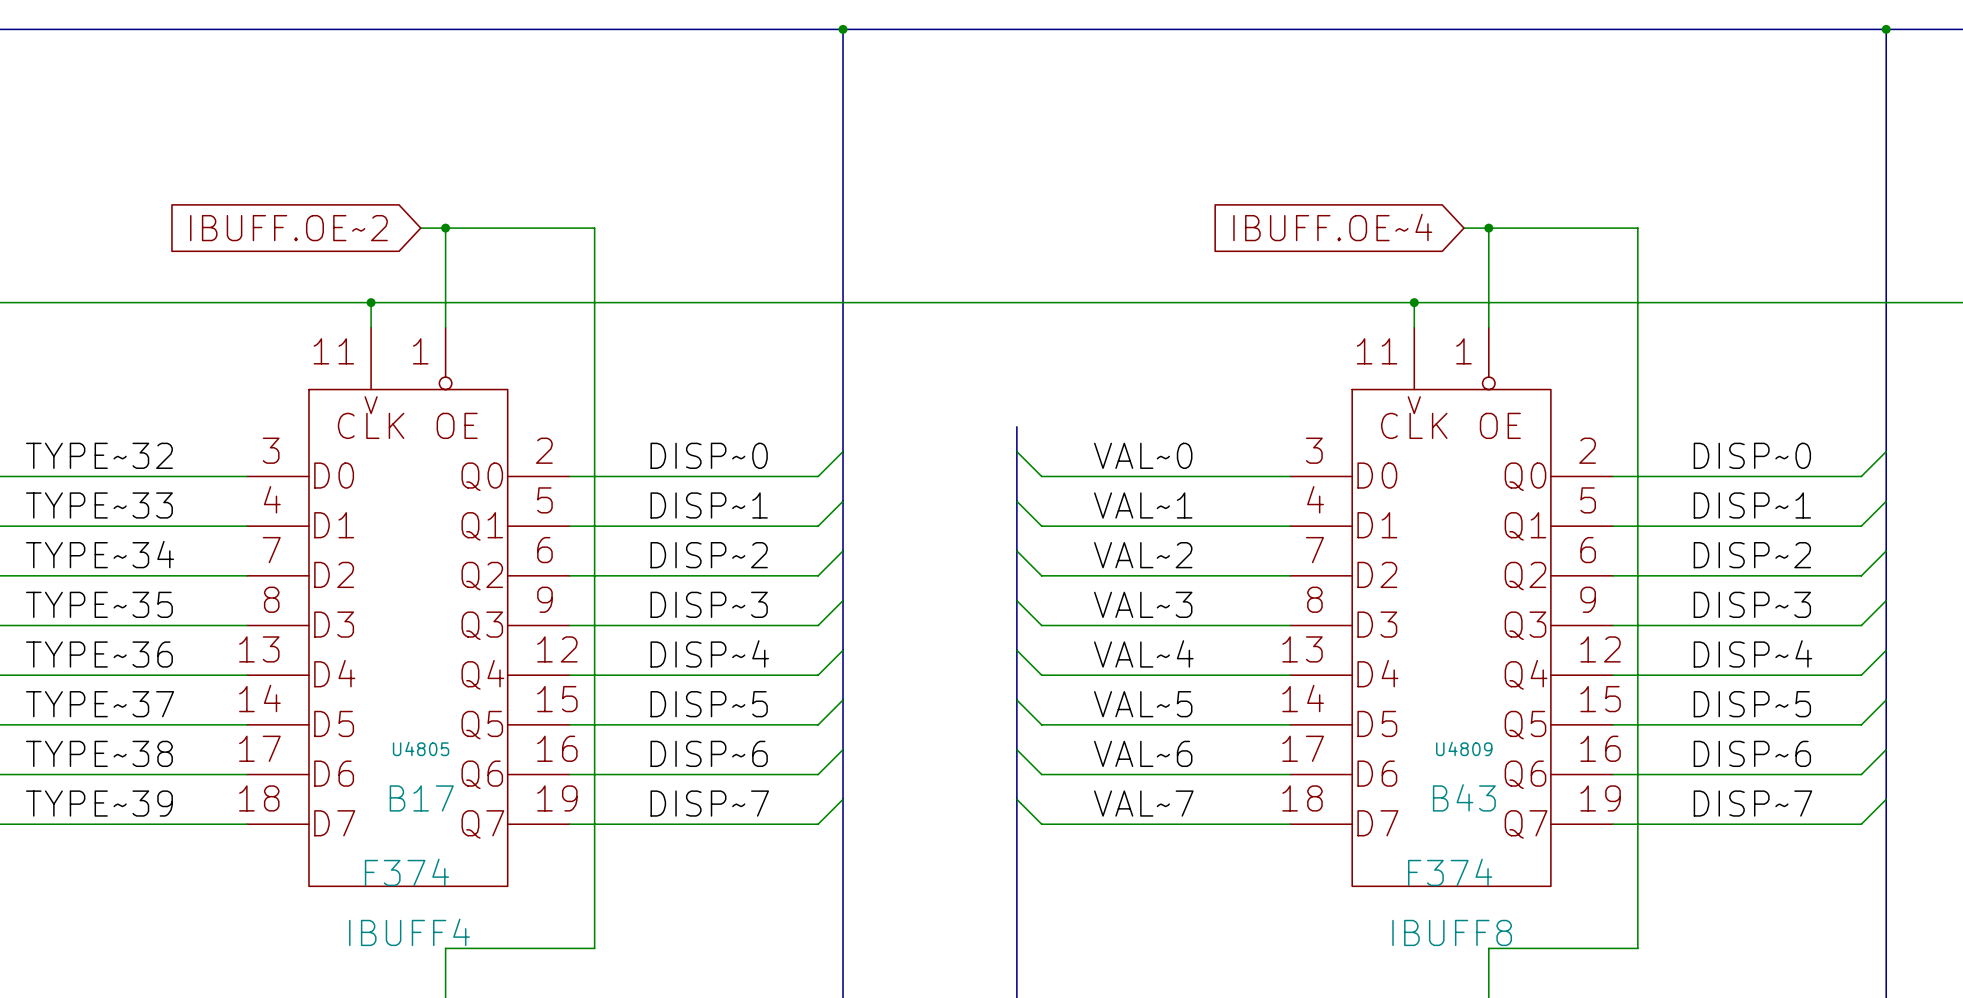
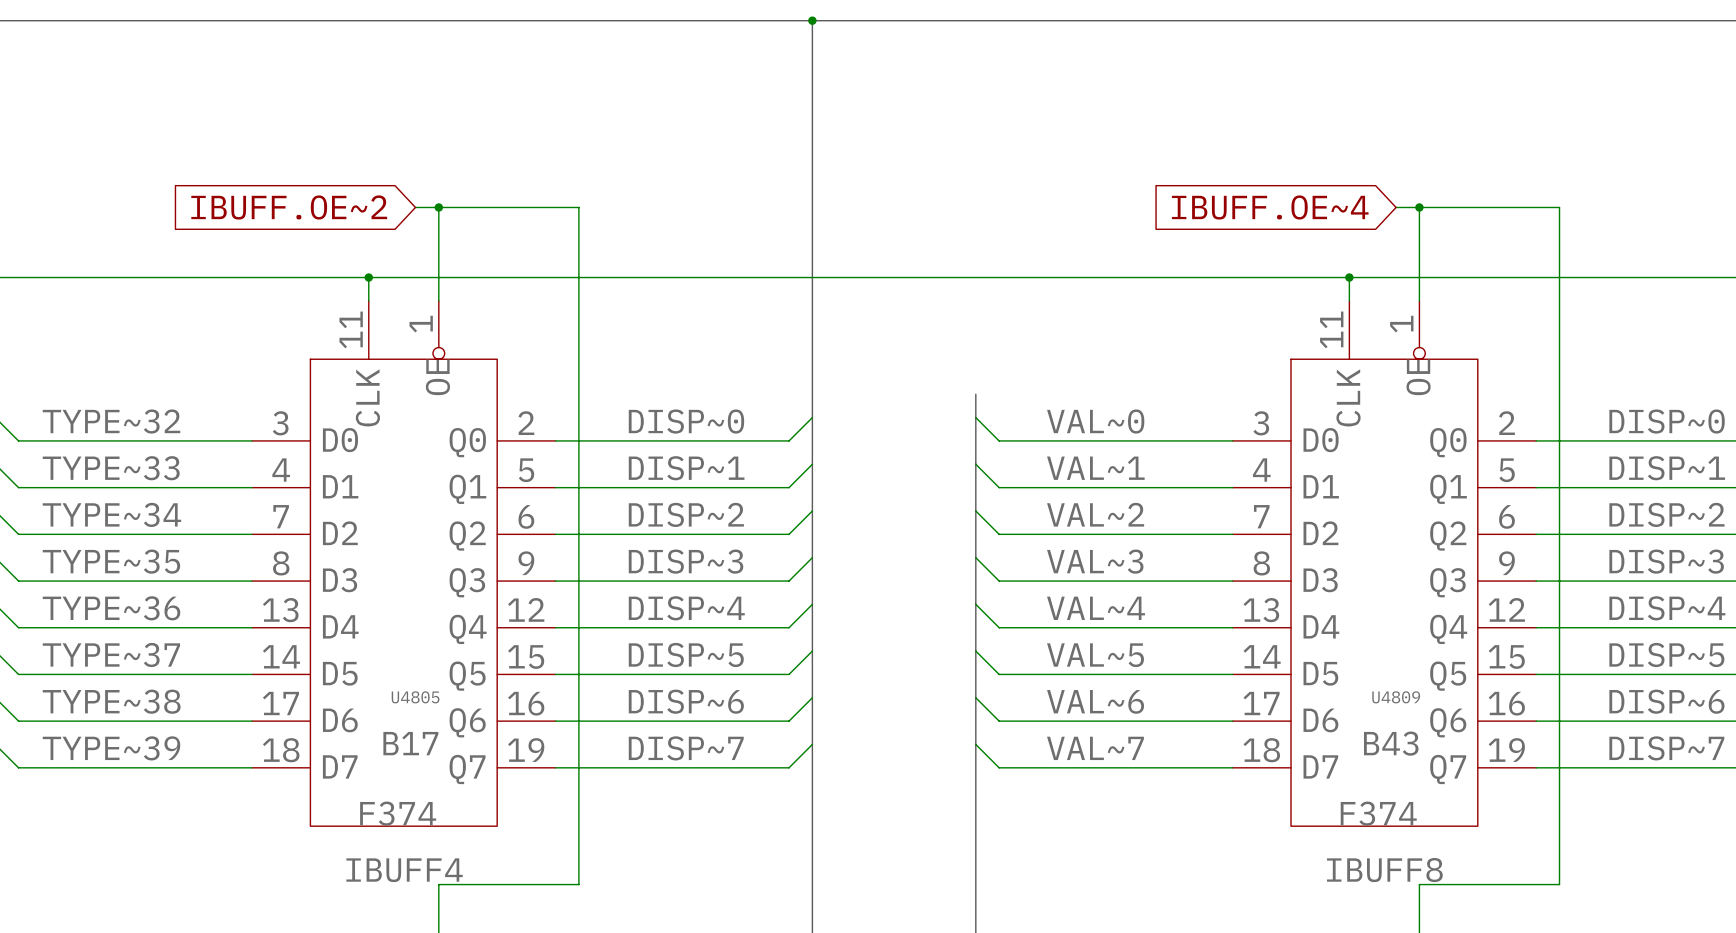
U4805 symbol: [246, 327, 570, 887] -> [252, 300, 556, 827]
U4809 symbol: [1290, 327, 1613, 887] -> [1232, 300, 1537, 827]

